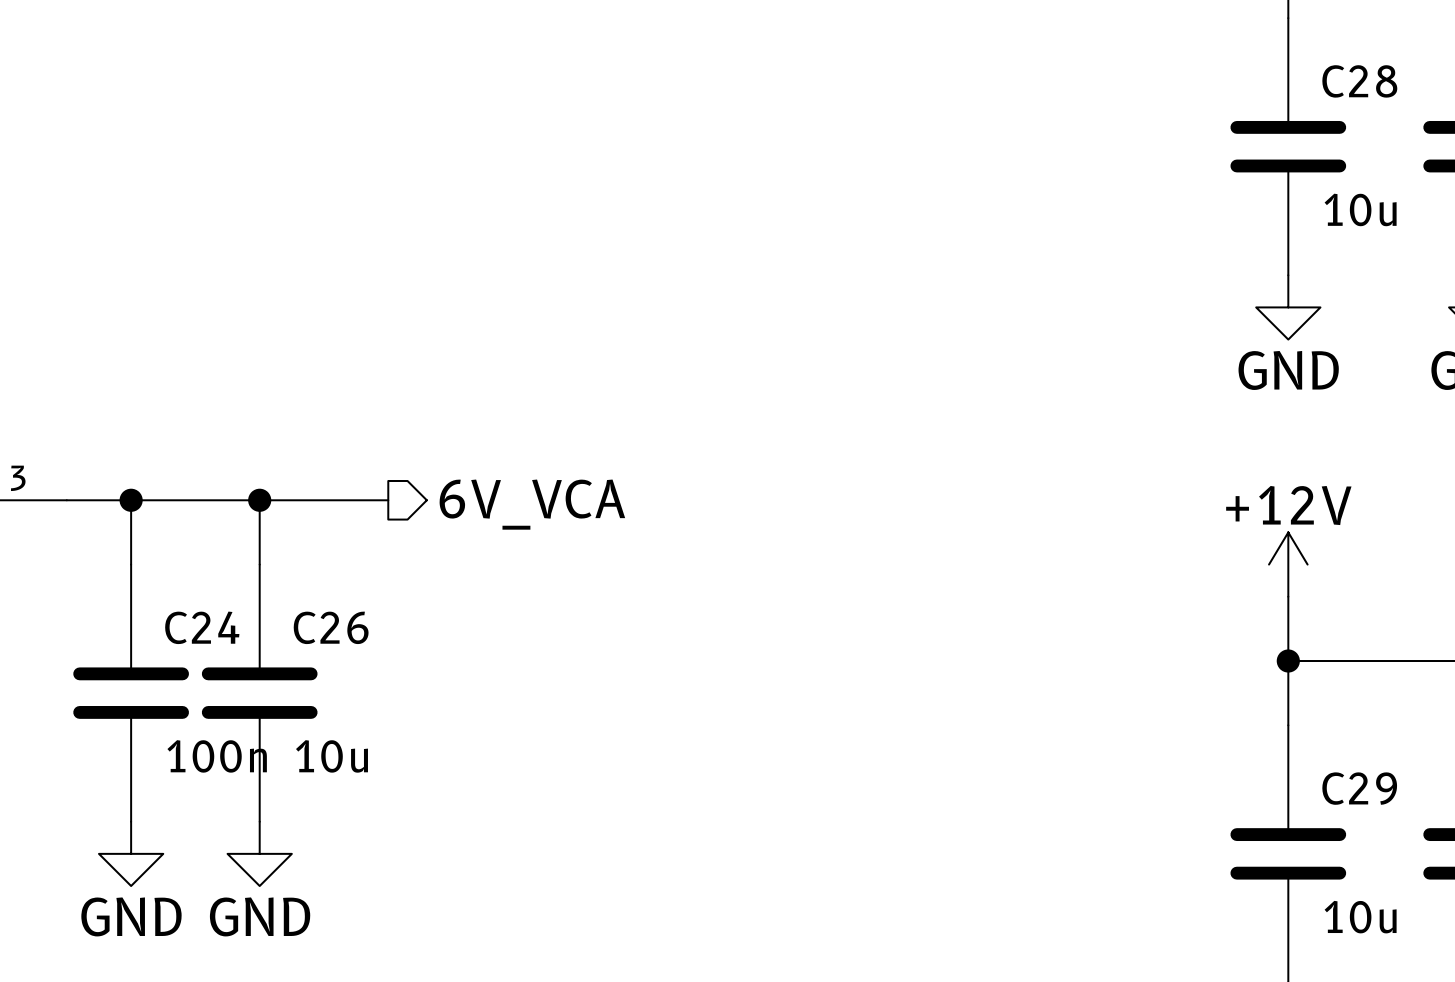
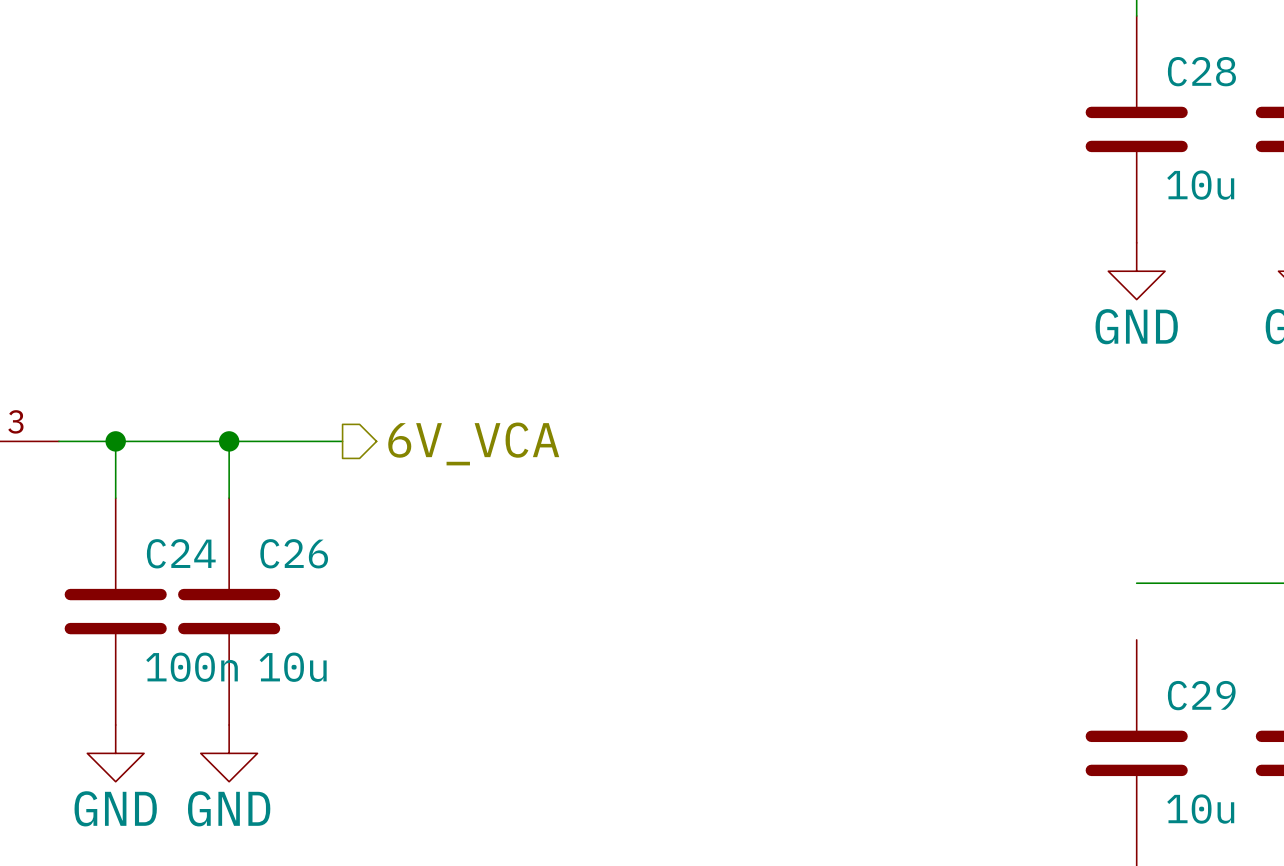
power symbol: +12V (1288, 564) -> none
wire: (1288, 596) (1288, 725) -> none
junction: (1288, 661) -> none

